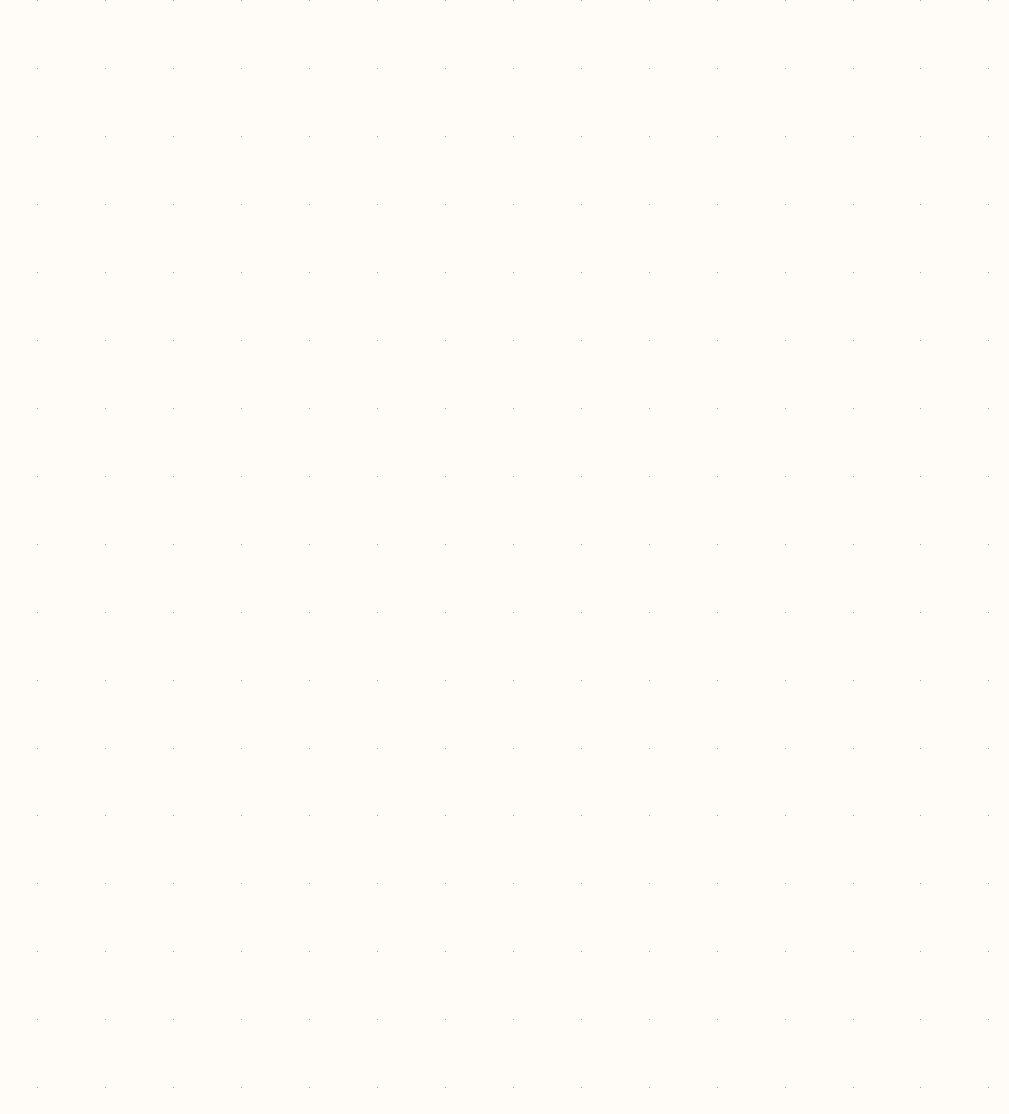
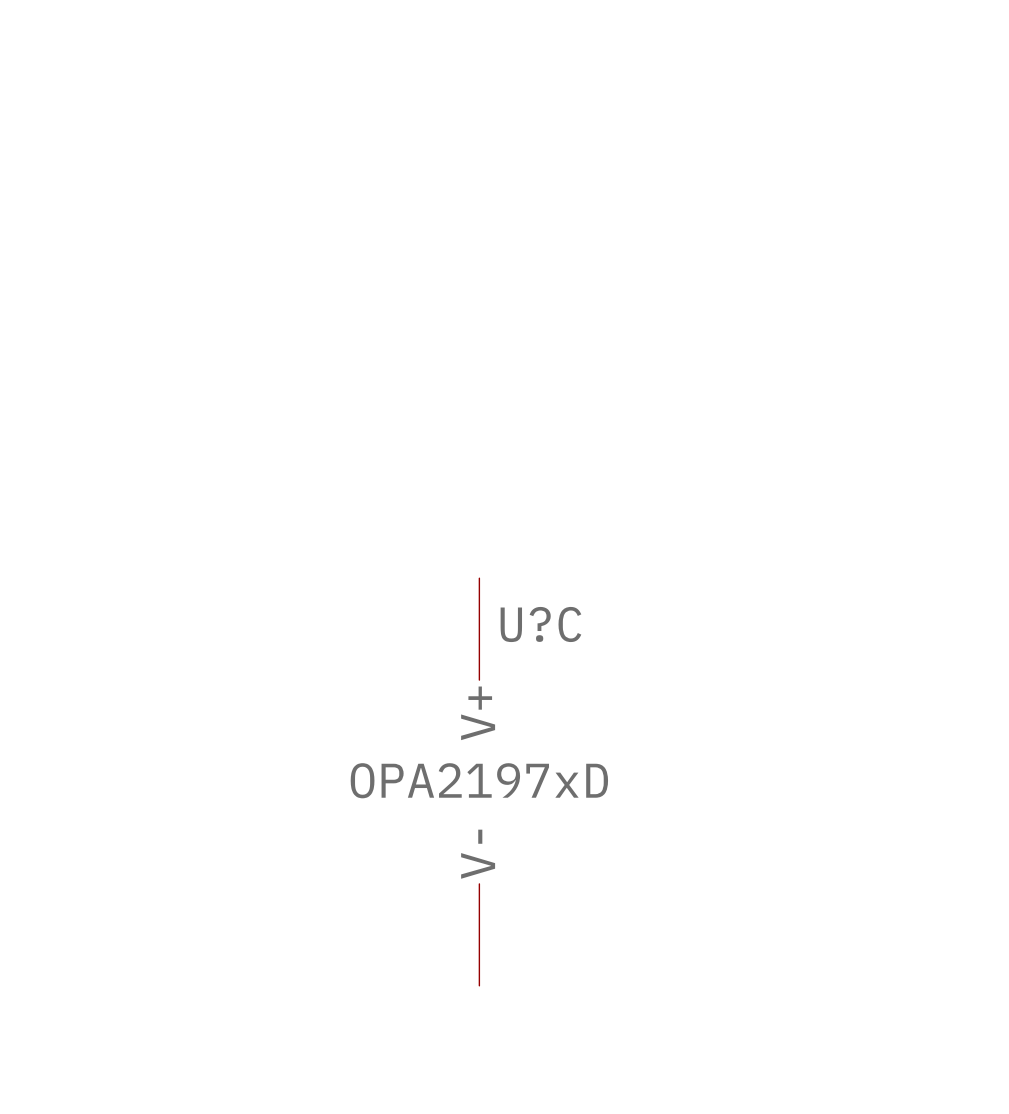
U?C: none -> OPA2197xD (479, 782)

